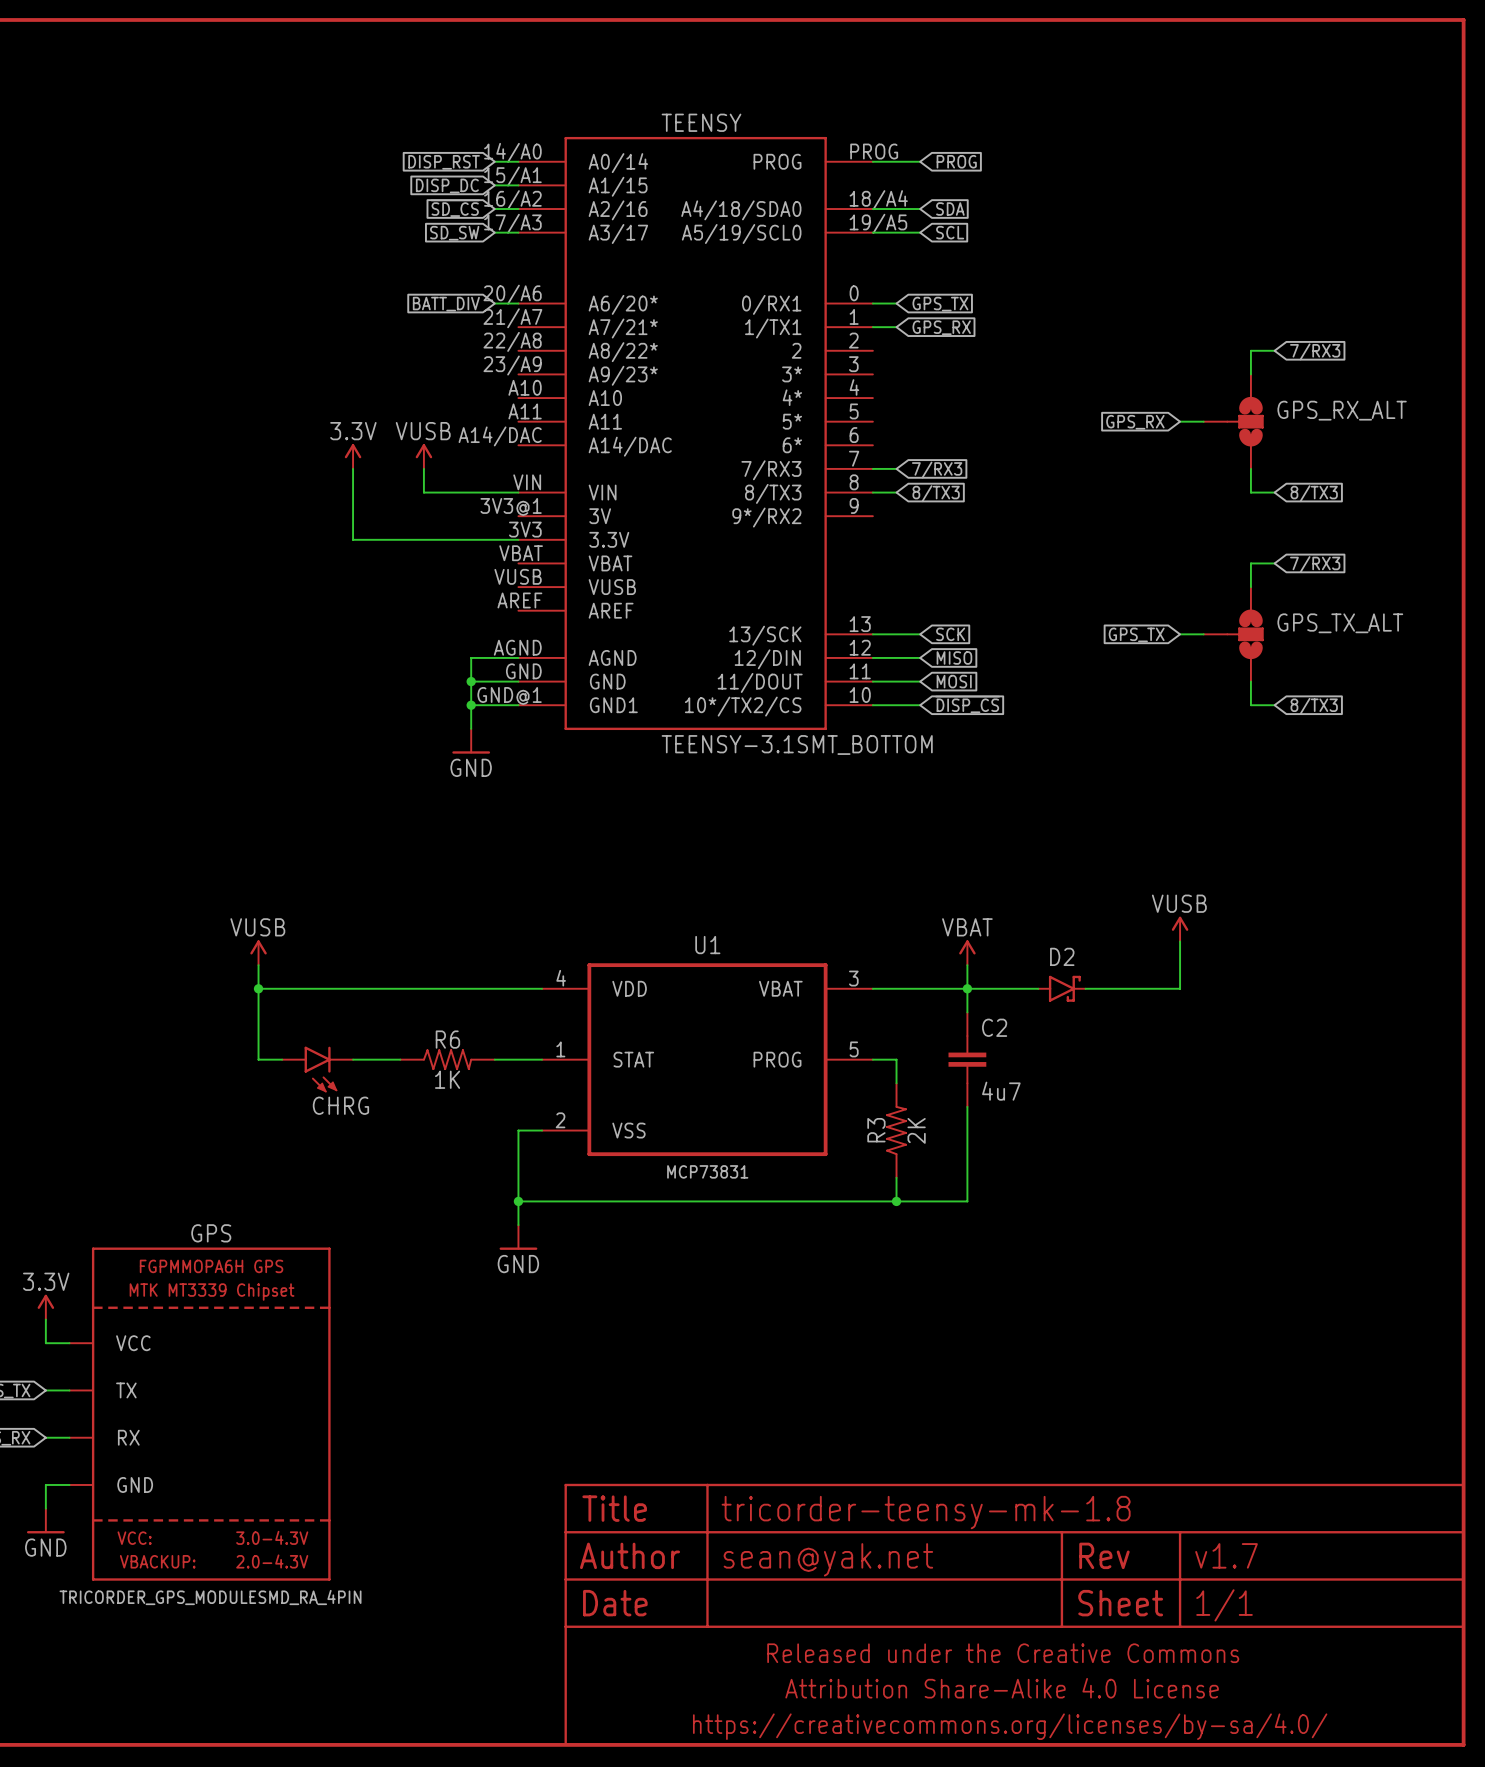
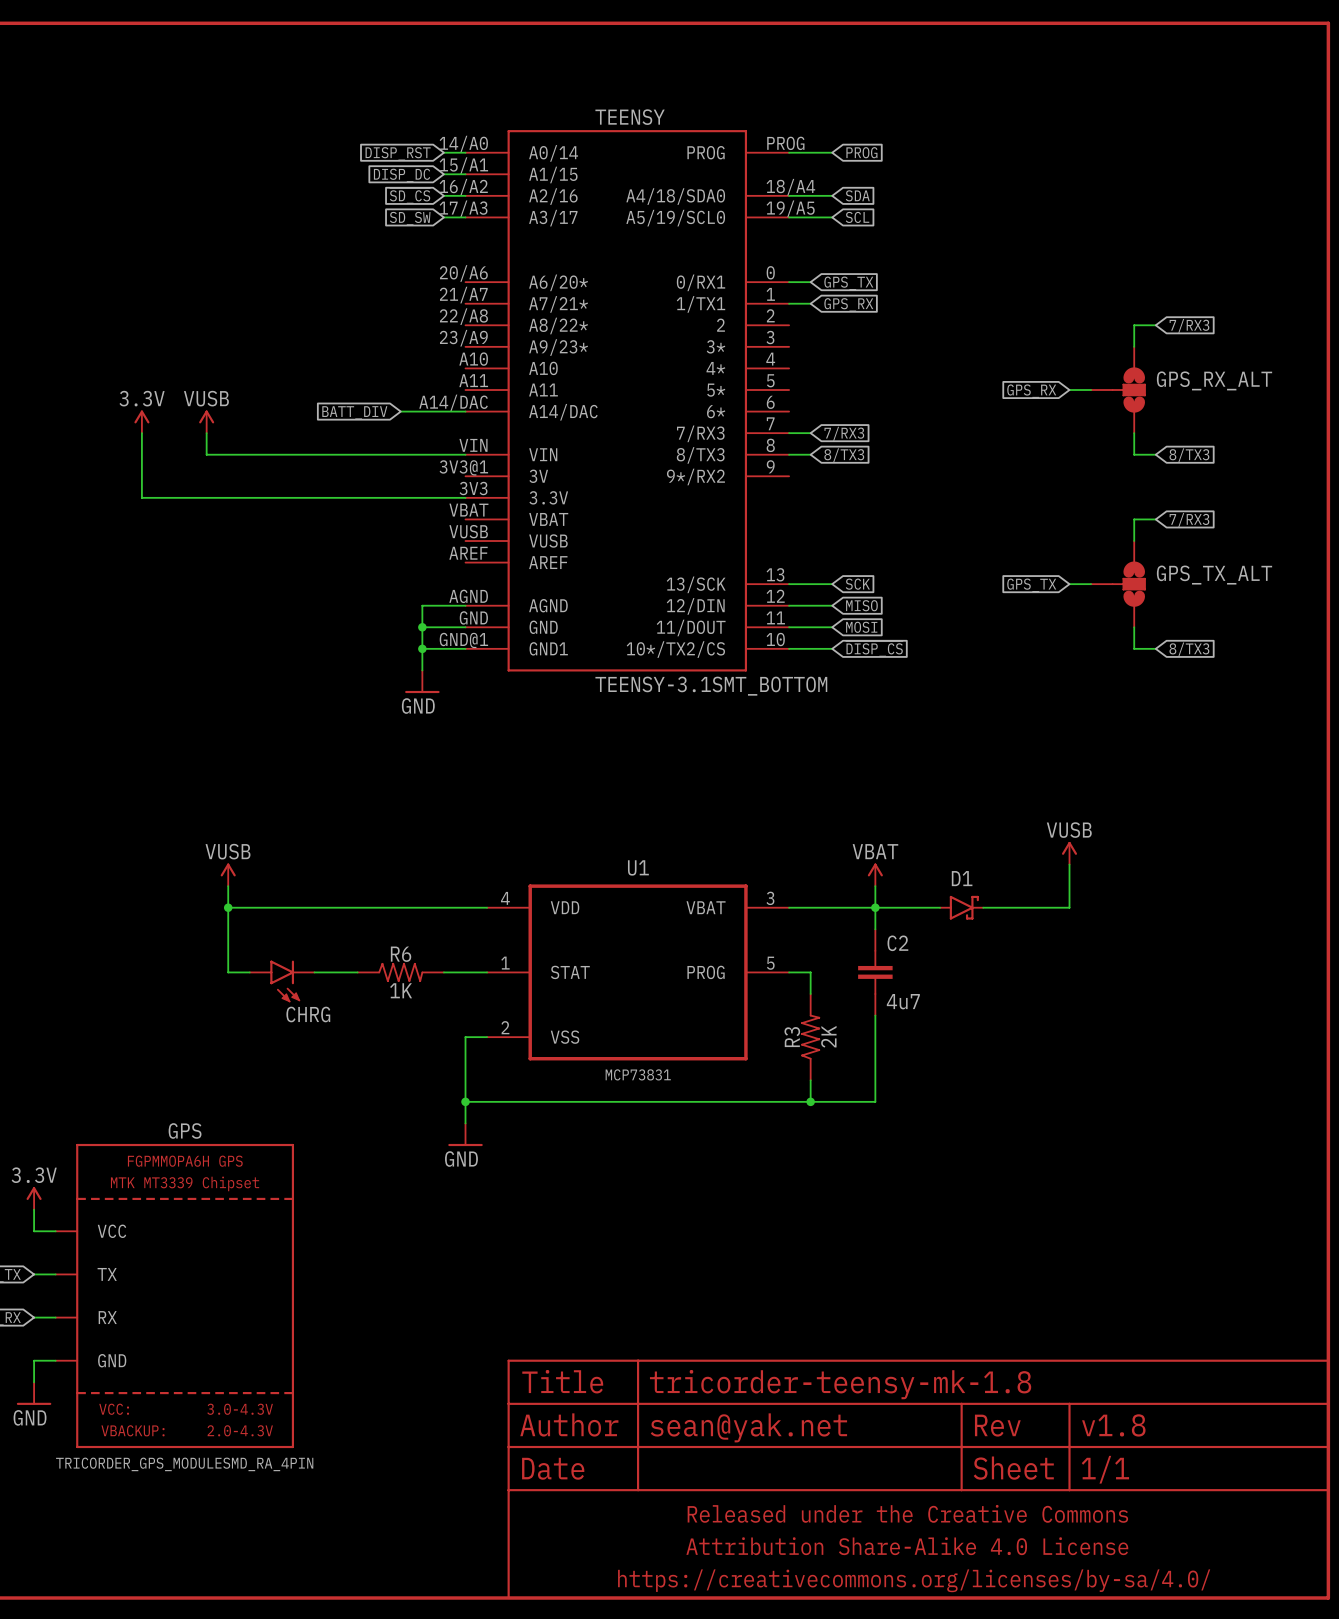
wire: (494, 303) (518, 303) -> none
global label position: BATT_DIV (446, 304) -> BATT_DIV (354, 412)
wire: none -> (400, 411) (465, 411)
power symbol position: 3.3V (353, 456) -> 3.3V (141, 421)
power symbol position: VUSB (423, 456) -> VUSB (206, 421)
wire: (353, 468) (353, 539) -> (141, 433) (141, 497) (314, 497)
wire: (423, 468) (423, 492) -> (206, 433) (206, 454) (379, 454)
D2 name: D2 (1062, 956) -> D1 (962, 878)
part text: v1.7 (1226, 1555) -> v1.8 (1113, 1425)

